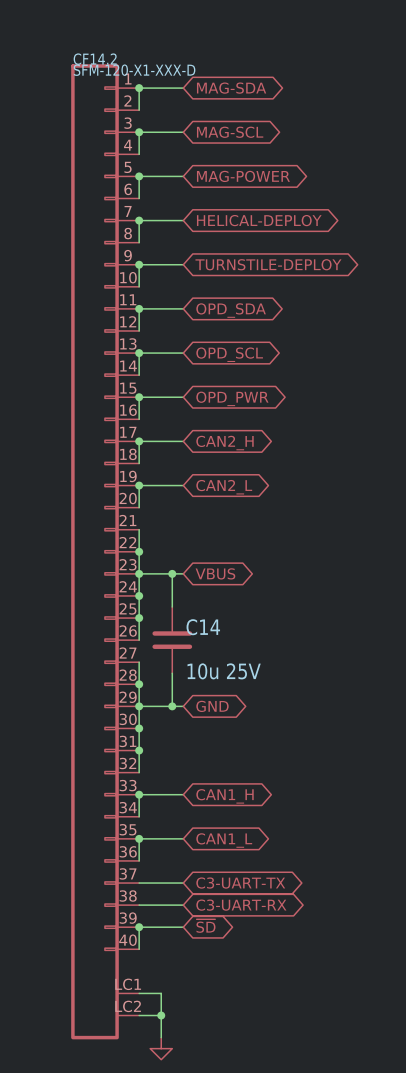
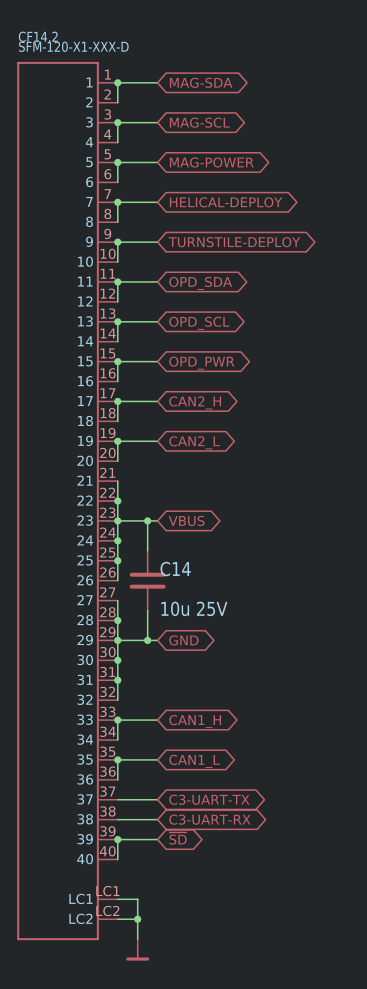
CF14.2 name position: CF14.2 (95, 59) -> CF14.2 (38, 36)
CF14.2 symbol: [71, 64, 140, 1040] -> [17, 61, 118, 941]
CF14.2 value position: SFM-120-X1-XXX-D (134, 70) -> SFM-120-X1-XXX-D (73, 46)
power symbol shape: [150, 1037, 173, 1060] -> [126, 939, 150, 961]

